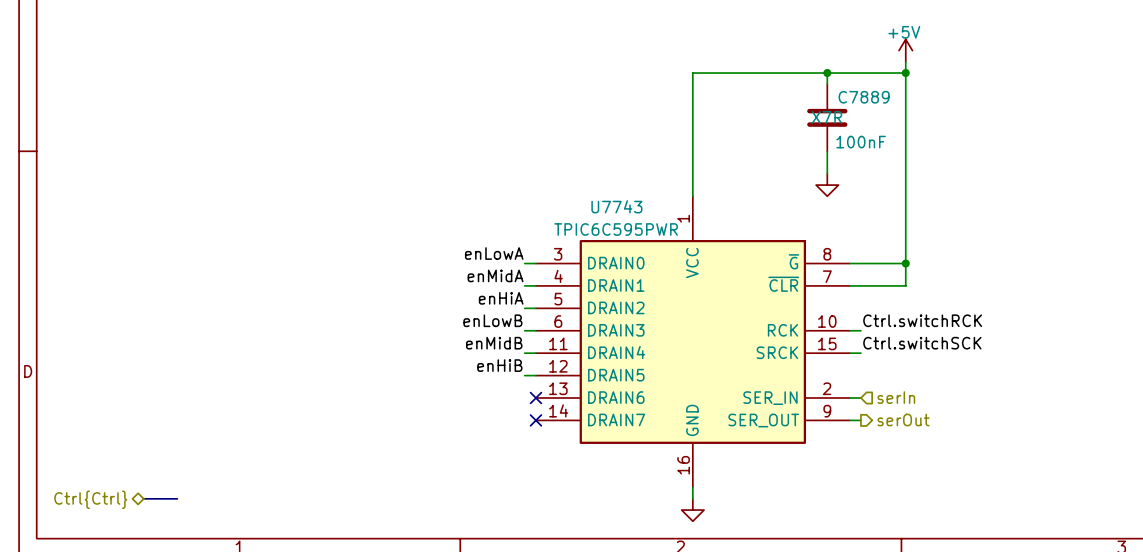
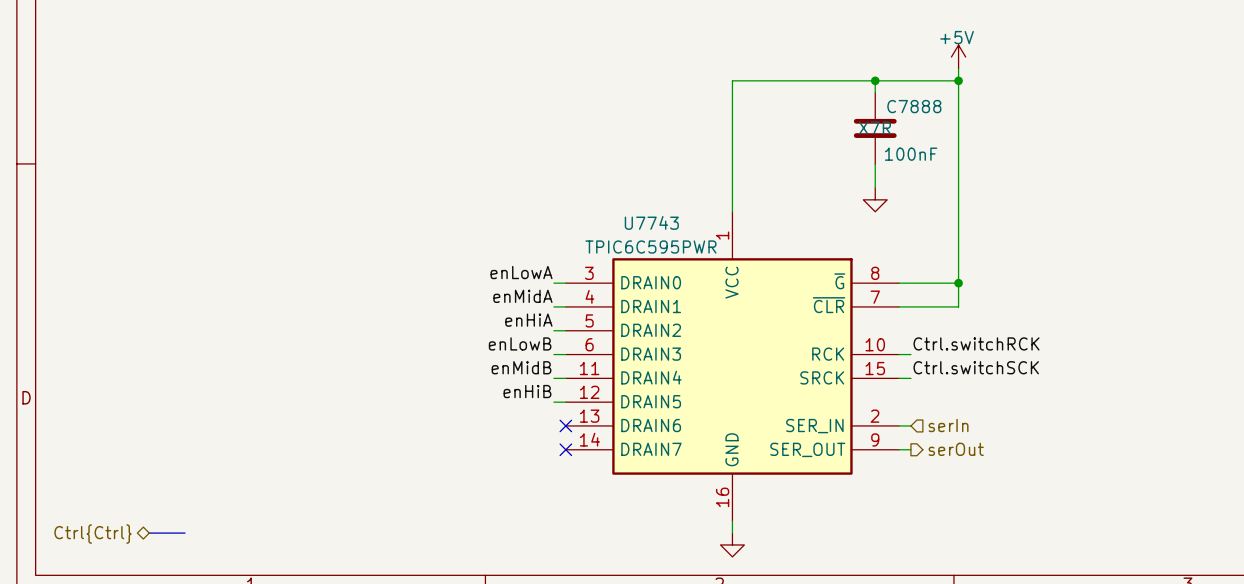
C7889 name: C7889 (864, 97) -> C7888 (914, 106)

